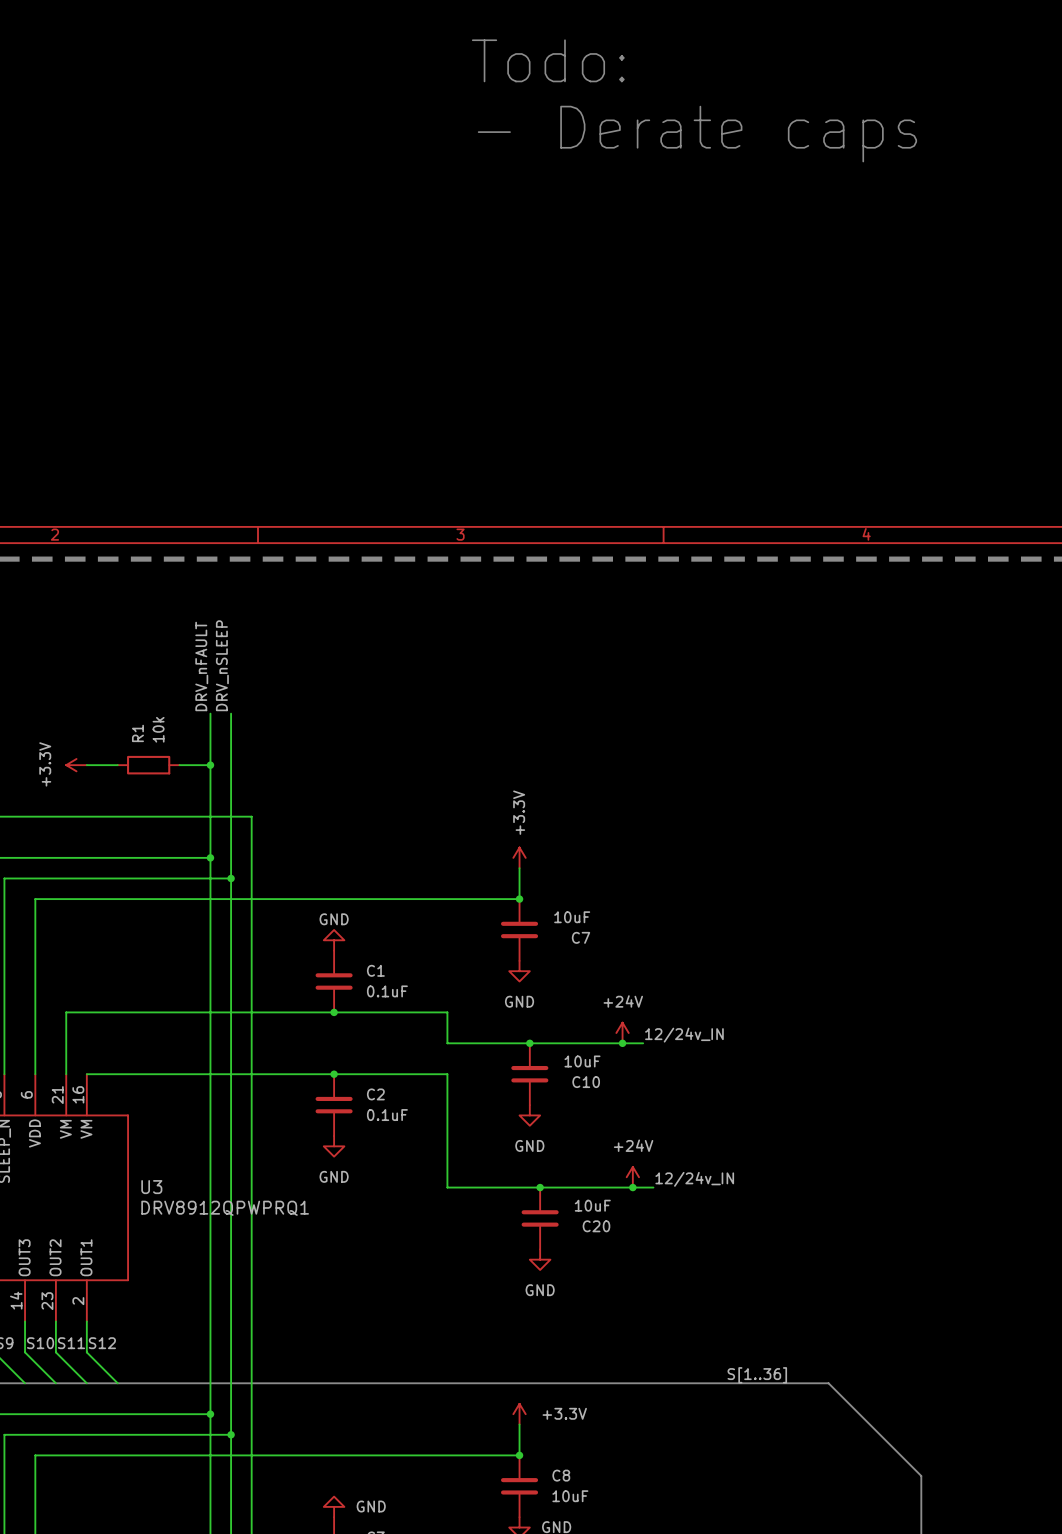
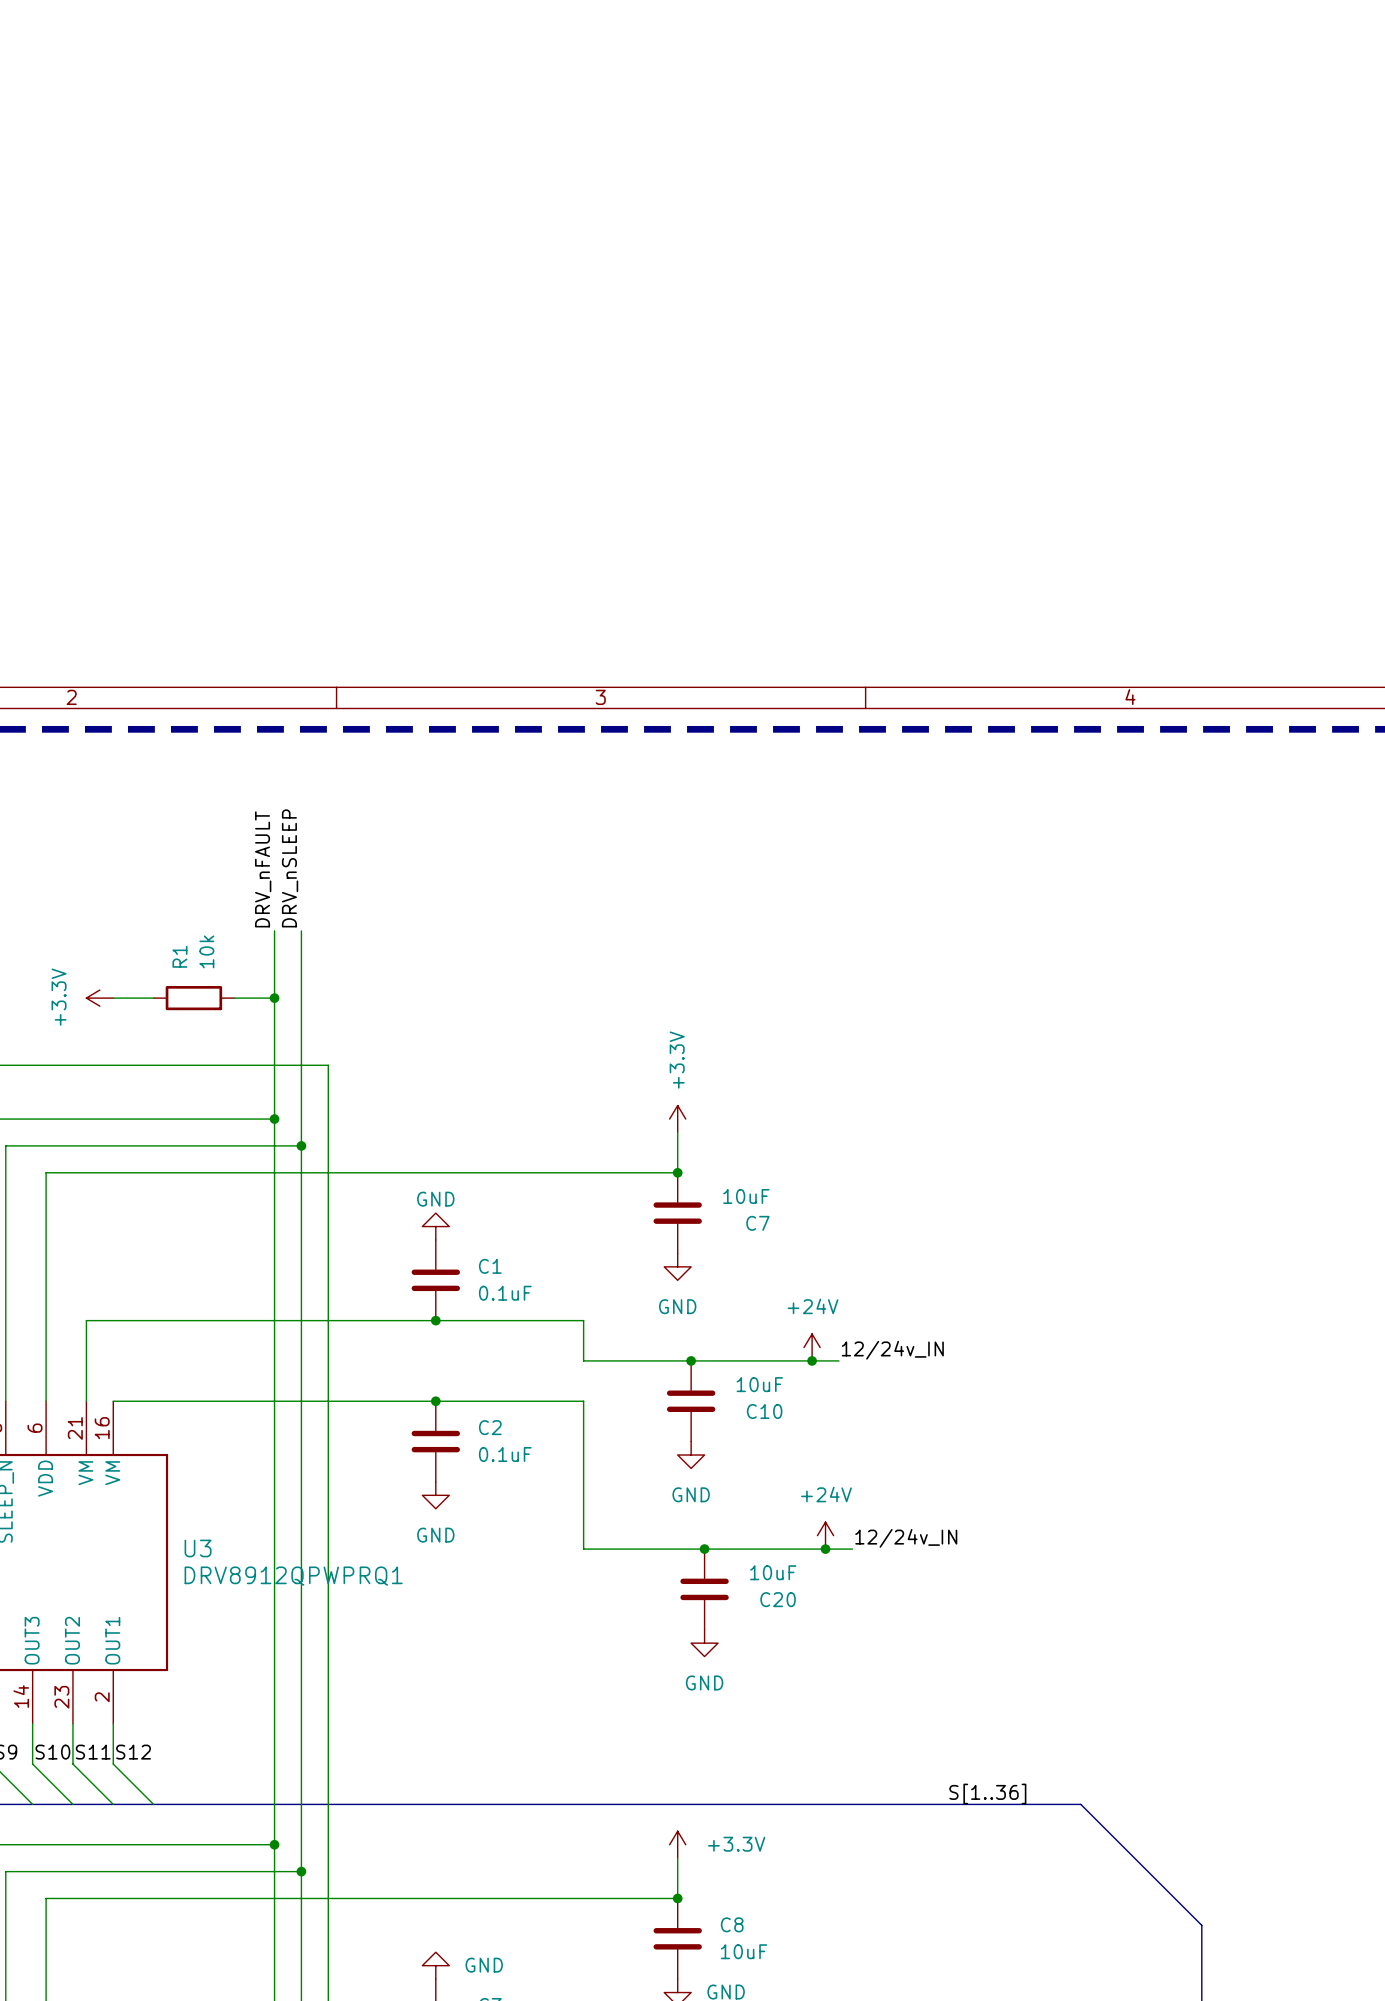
text: Todo: (548, 60) -> none
text: - Derate caps (697, 134) -> none

